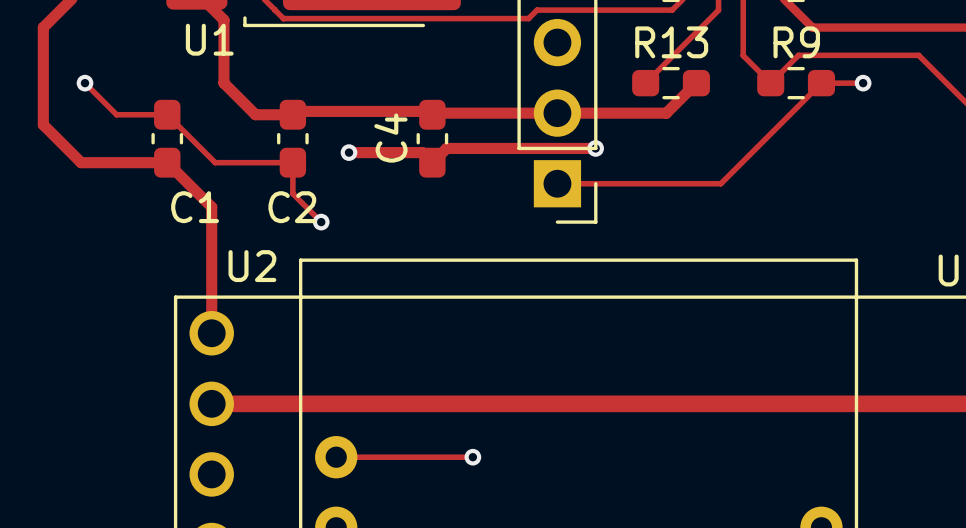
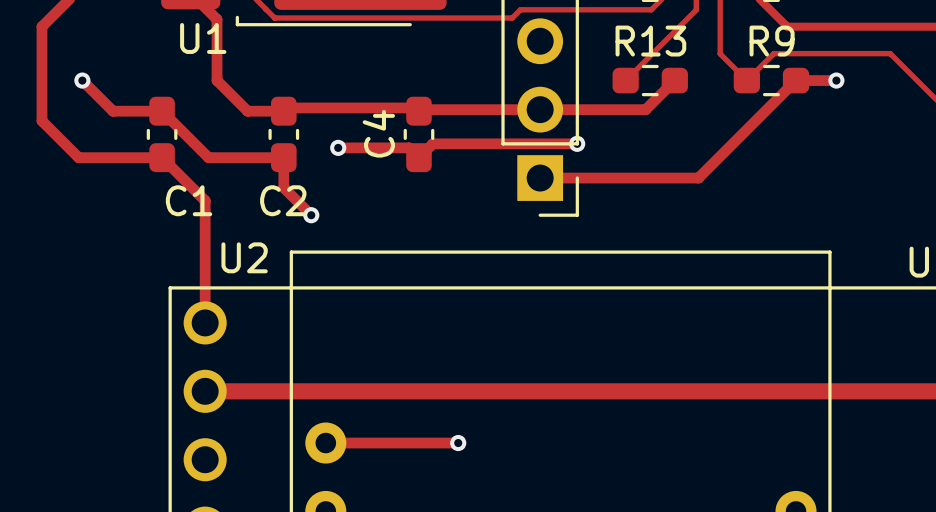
track width: thin (85, 83) (116, 114) (167, 114) (215, 162) (292, 162) (292, 193) (321, 222) -> thick (82, 80) (113, 111) (162, 111) (208, 157) (283, 157) (283, 187) (311, 215)
track width: thin (863, 83) (821, 83) (720, 183) (557, 183) -> thick (836, 80) (796, 80) (698, 178) (540, 178)
track width: thin (336, 457) (472, 457) -> thick (325, 443) (458, 443)

